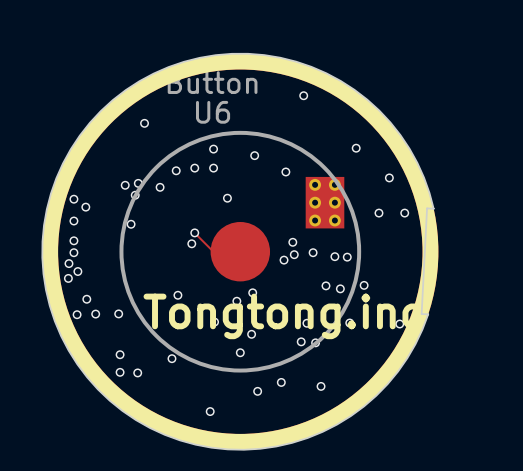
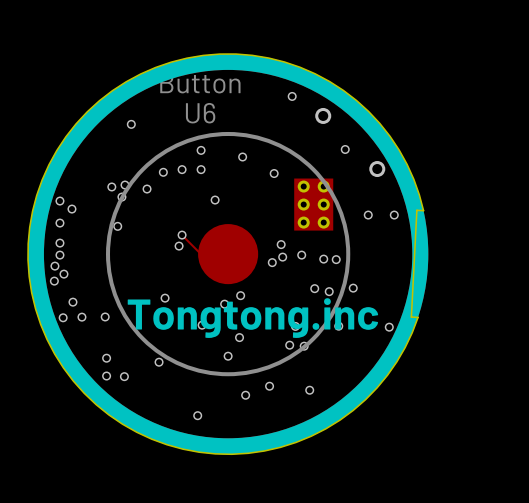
via: none -> (323, 115)
via size: [384, 173, 394, 183] -> [369, 161, 386, 178]

